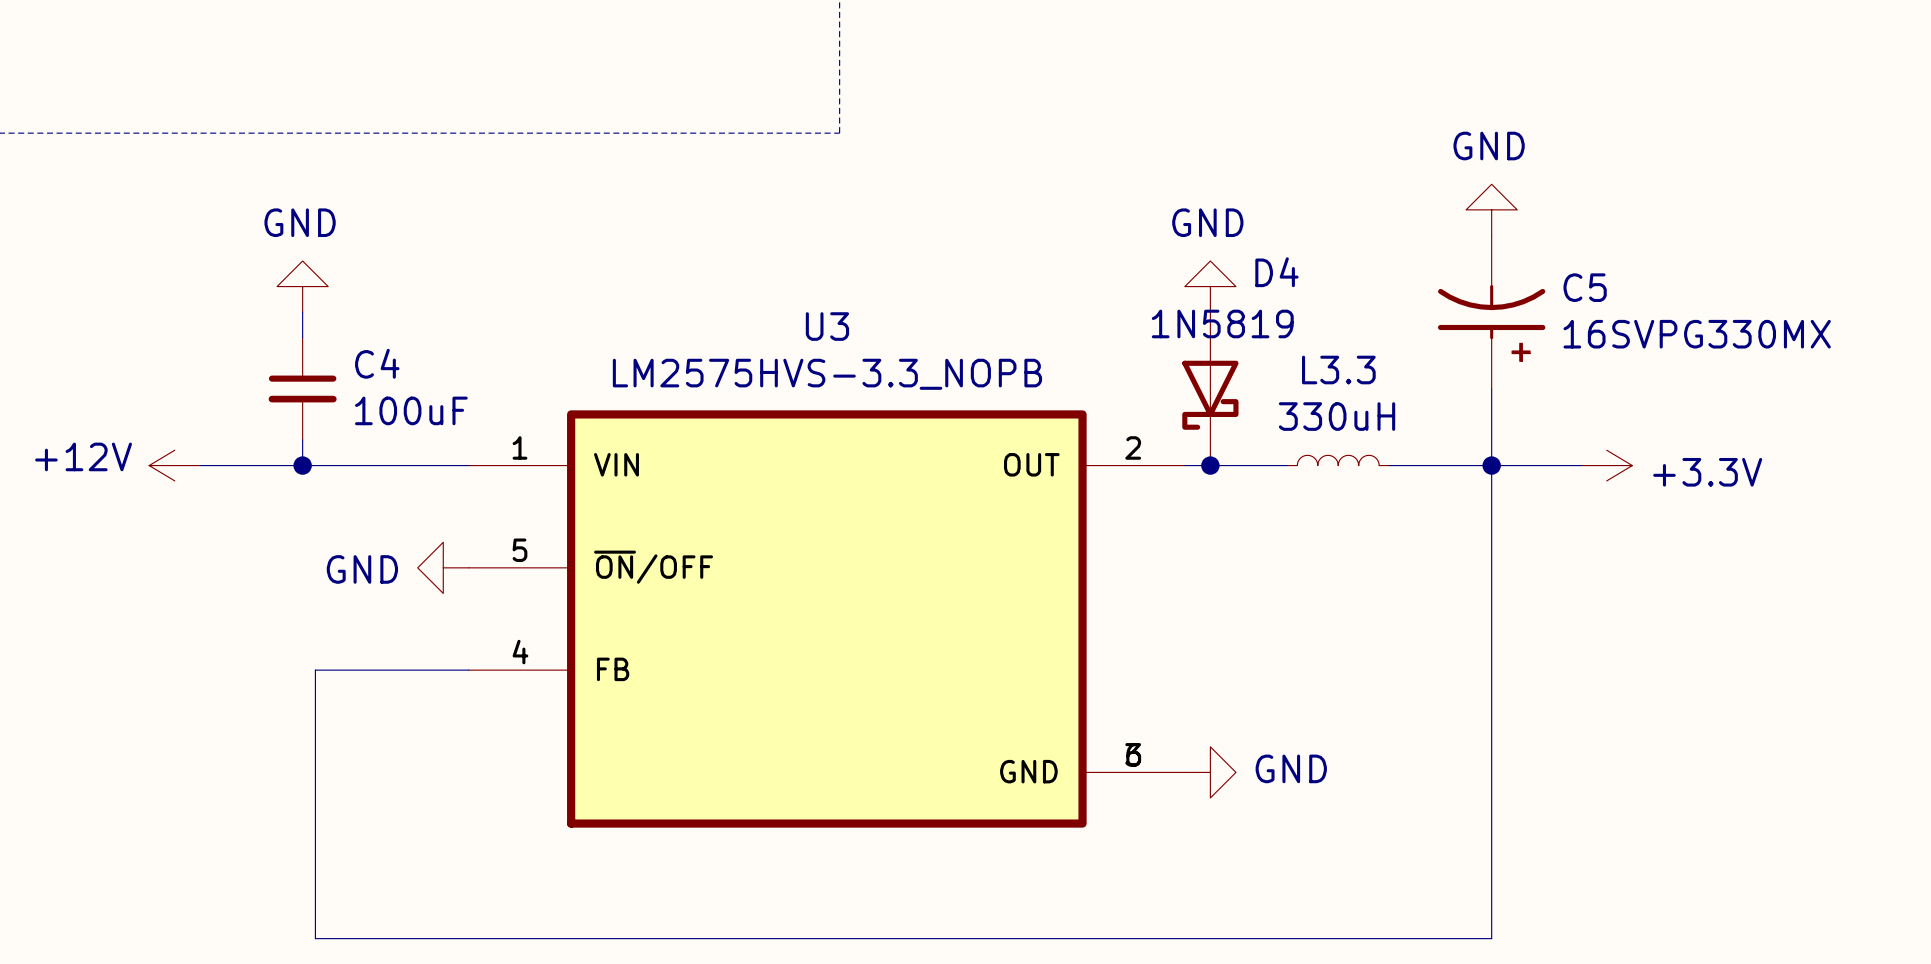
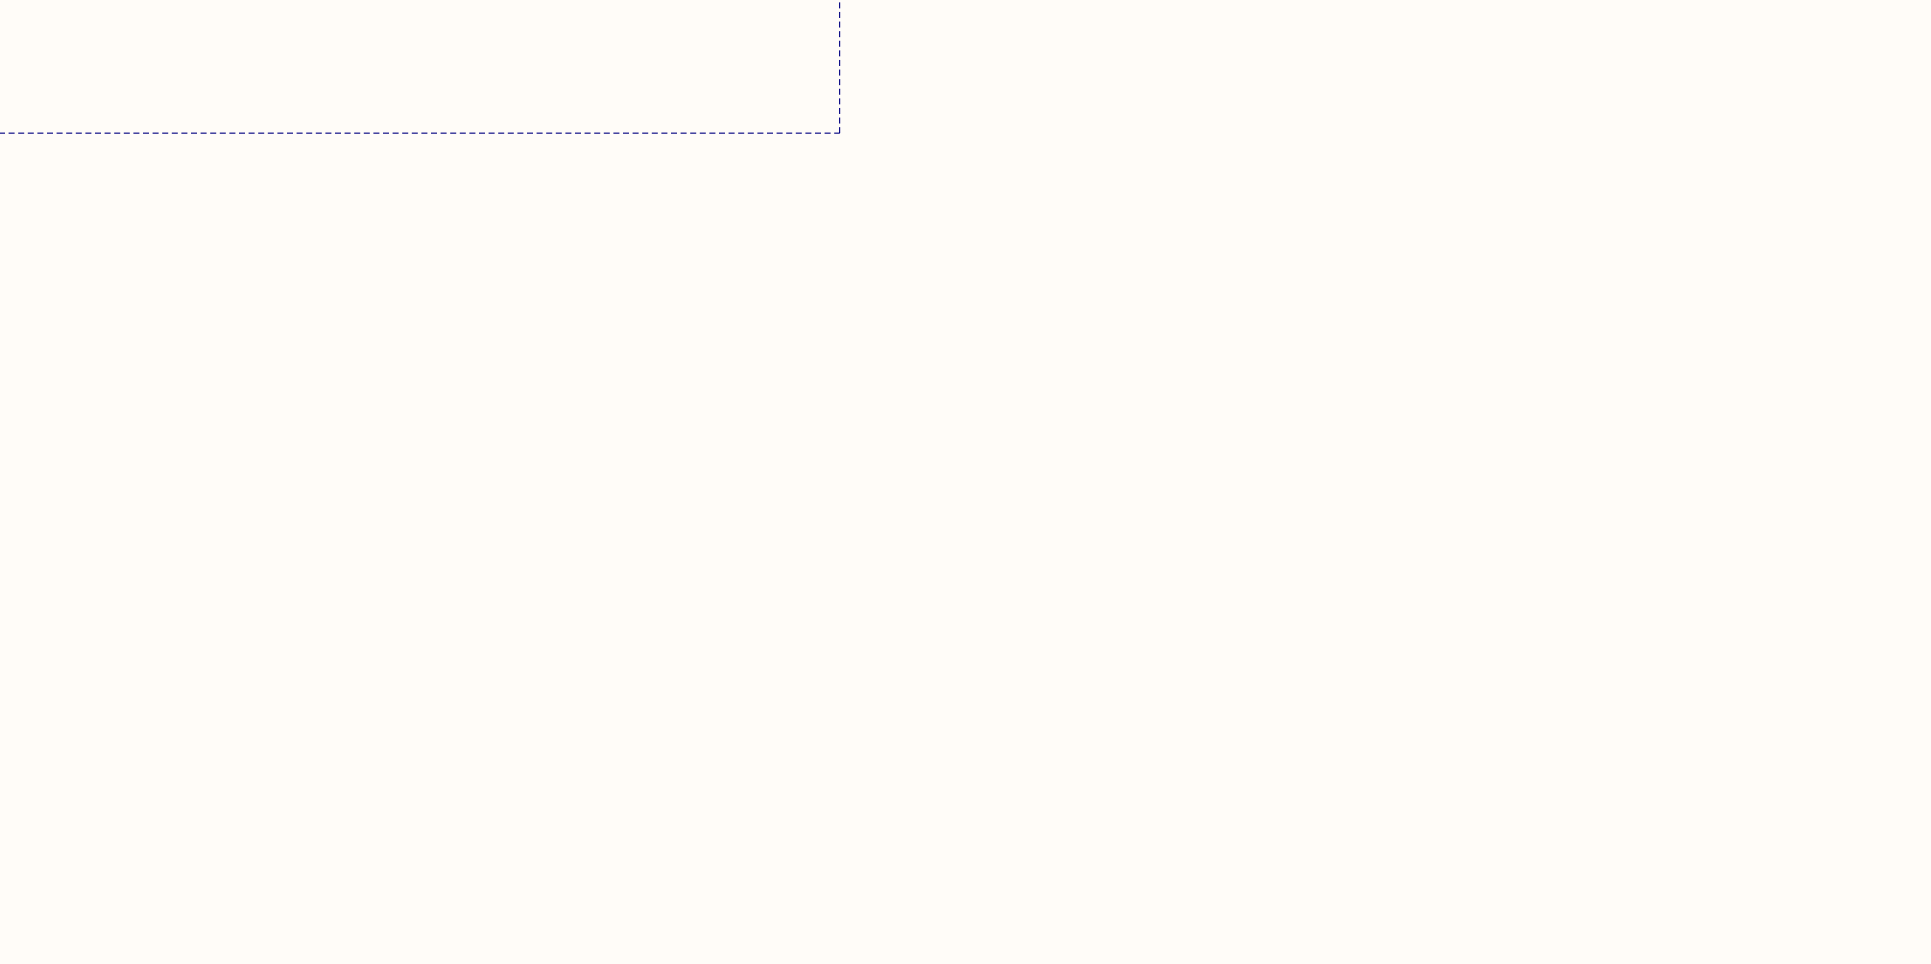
power symbol: GND (1491, 209) -> none
power symbol: GND (302, 286) -> none
power symbol: GND (1210, 286) -> none
wire: (302, 312) (302, 337) -> none
C5: 16SVPG330MX (1491, 312) -> none
C4: 100uF (302, 388) -> none
D4: 1N5819 (1210, 388) -> none
wire: (1491, 388) (1491, 938) (315, 938) (315, 670) (468, 670) -> none
wire: (302, 440) (302, 465) -> none
L3.3: 330uH (1338, 460) -> none
power symbol: +12V (174, 465) -> none
wire: (200, 465) (468, 465) -> none
junction: (302, 465) -> none
wire: (1184, 465) (1287, 465) -> none
junction: (1210, 465) -> none
wire: (1389, 465) (1581, 465) -> none
junction: (1491, 465) -> none
power symbol: +3.3V (1606, 465) -> none
power symbol: GND (443, 567) -> none
U3: LM2575HVS-3.3_NOPB (826, 618) -> none
power symbol: GND (1210, 772) -> none

